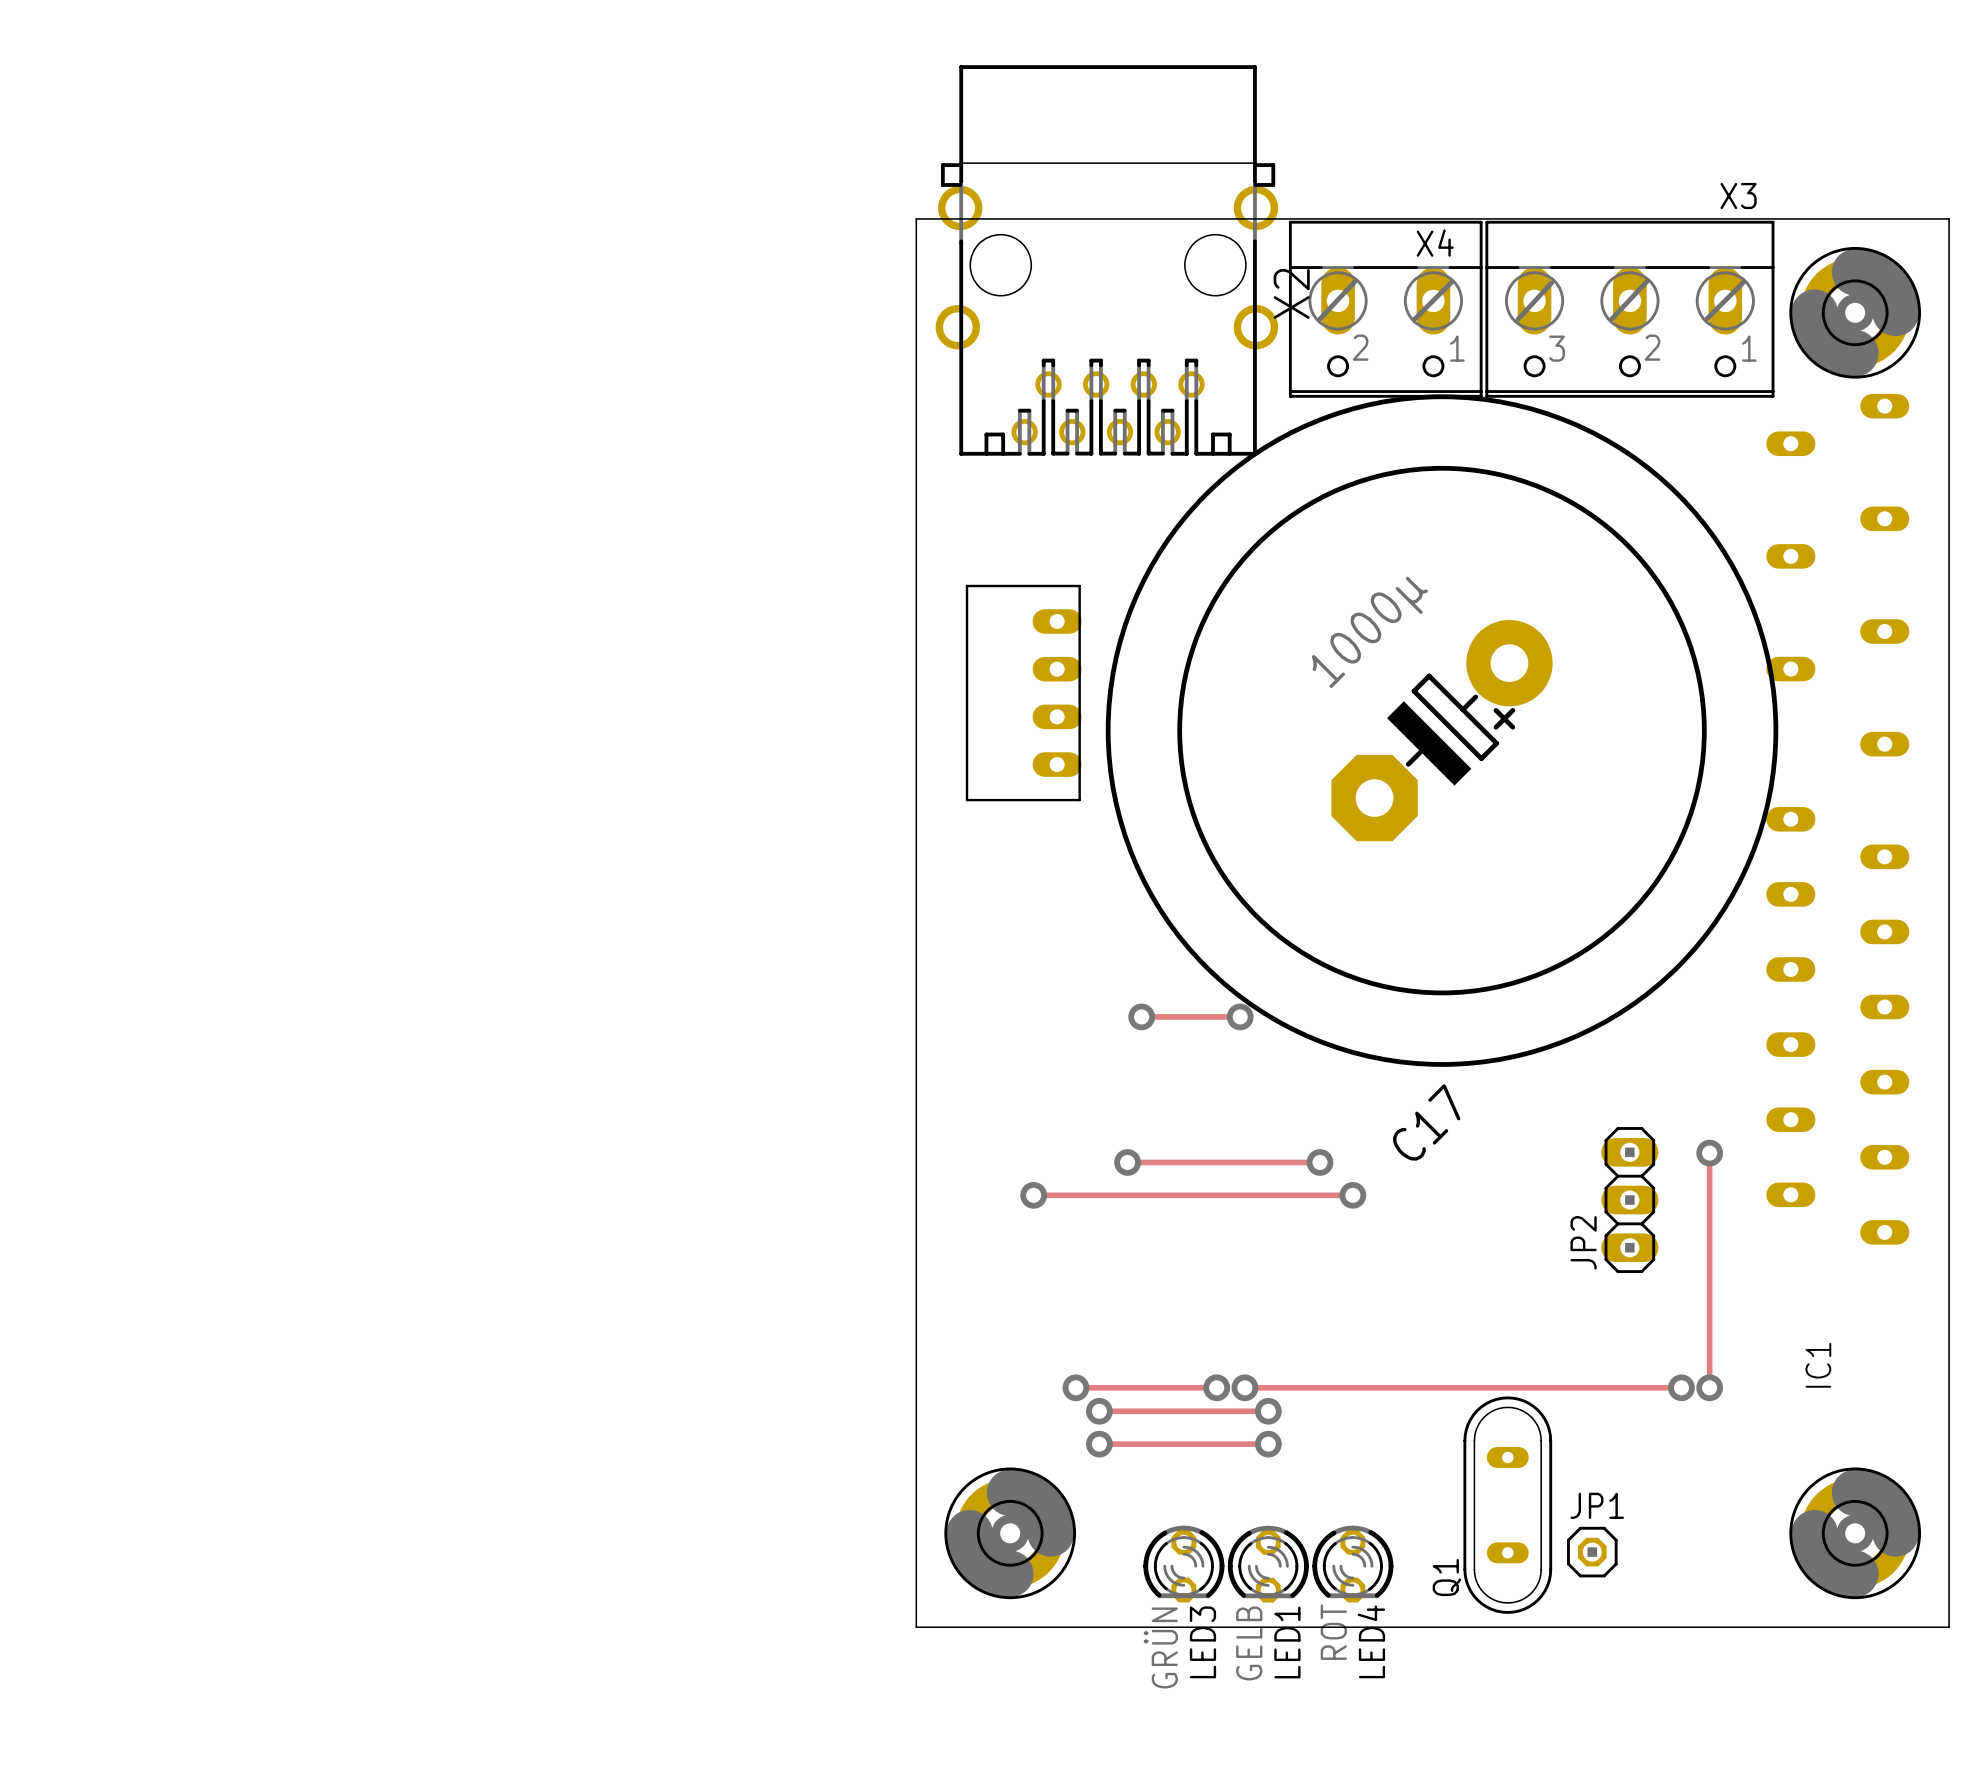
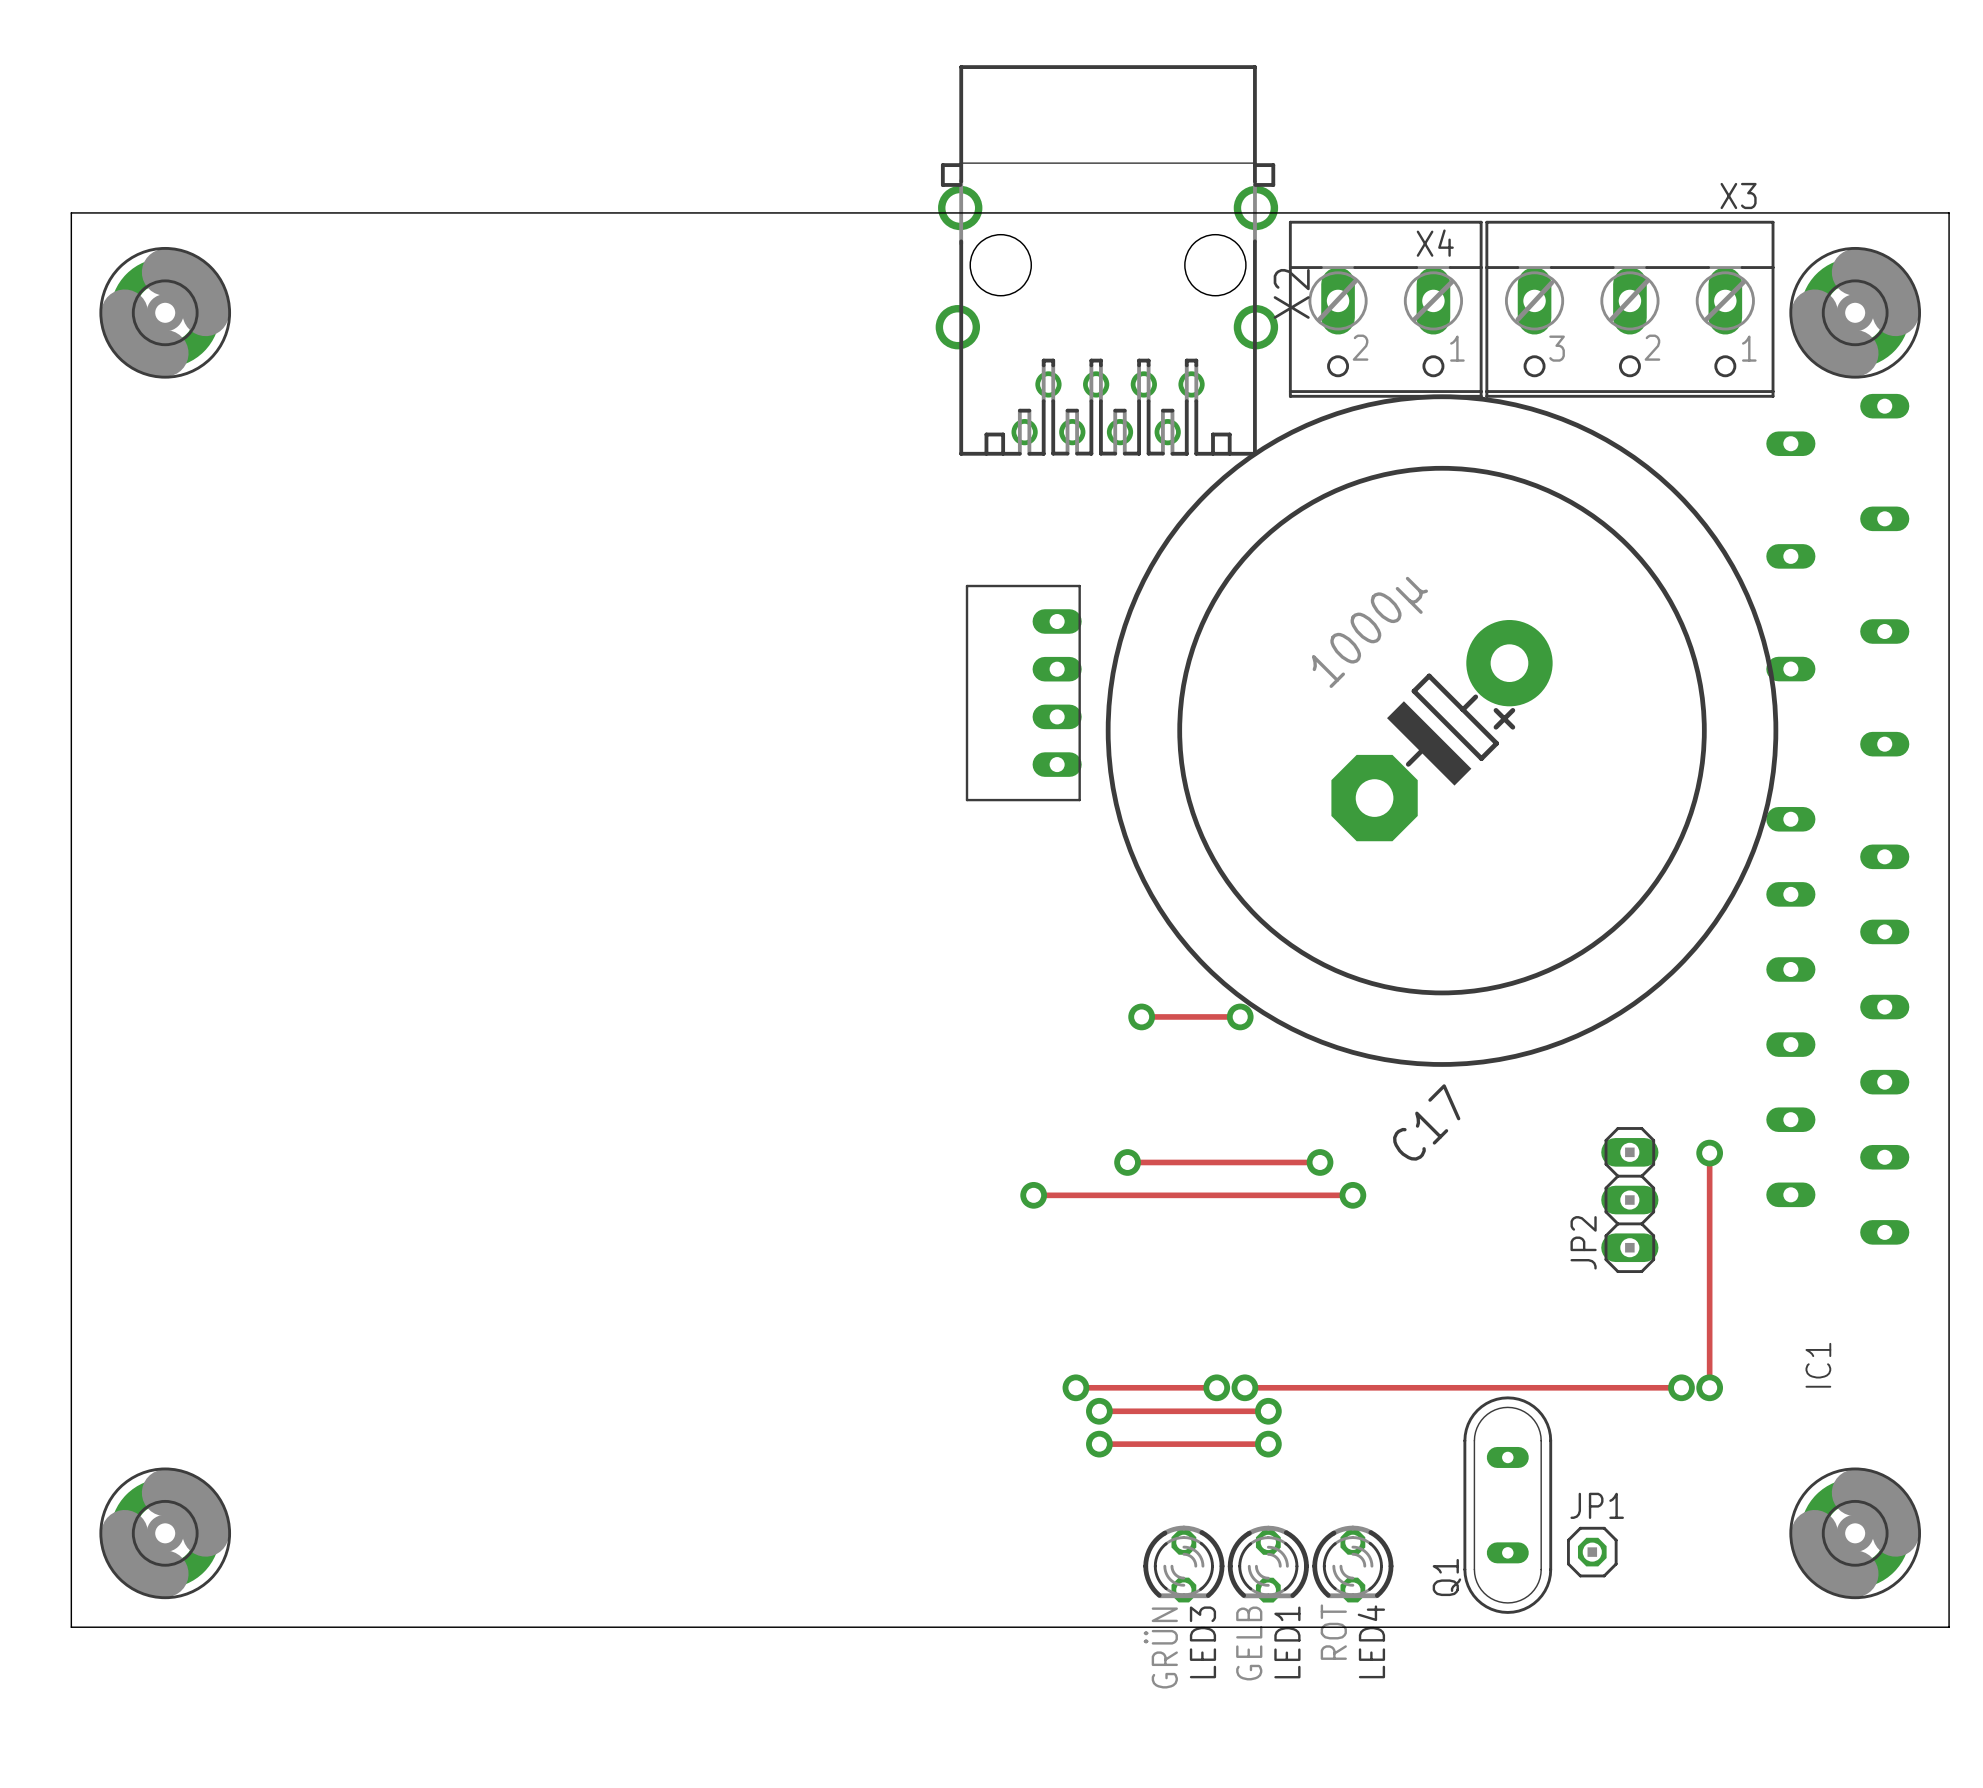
board edge: (1949, 218) (916, 218) (916, 1627) -> (1949, 218) (1949, 212) (71, 212) (71, 1627) (916, 1627)
part: none -> (165, 312)
part: none -> (165, 1533)
part: (1010, 1533) -> none

